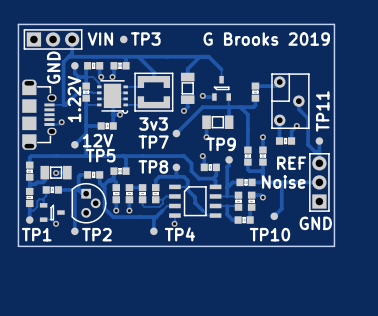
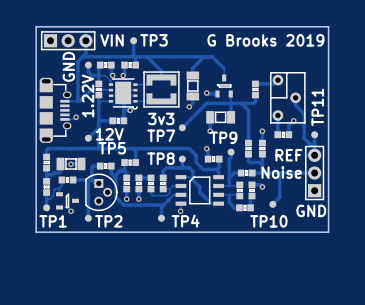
track: none -> (133, 40) (134, 56)

